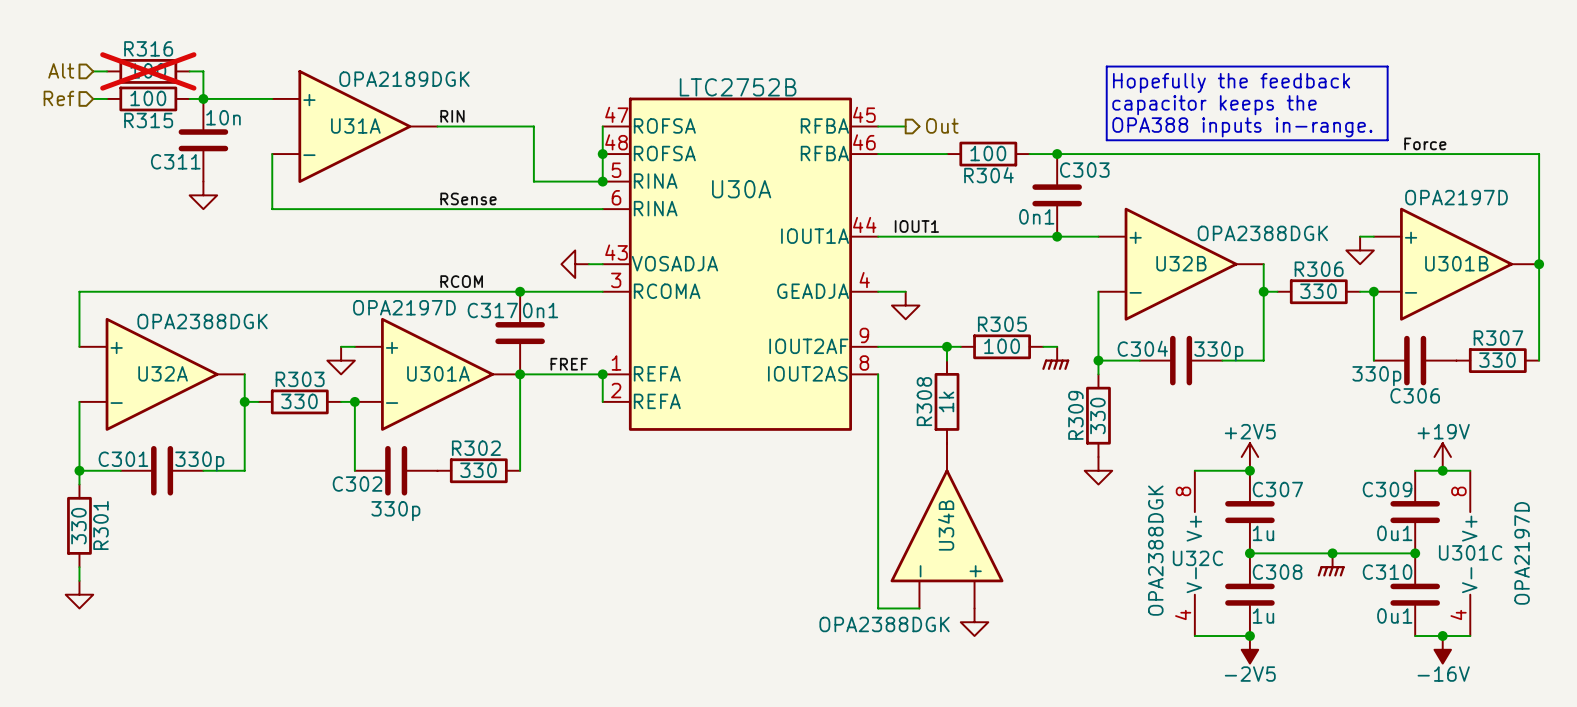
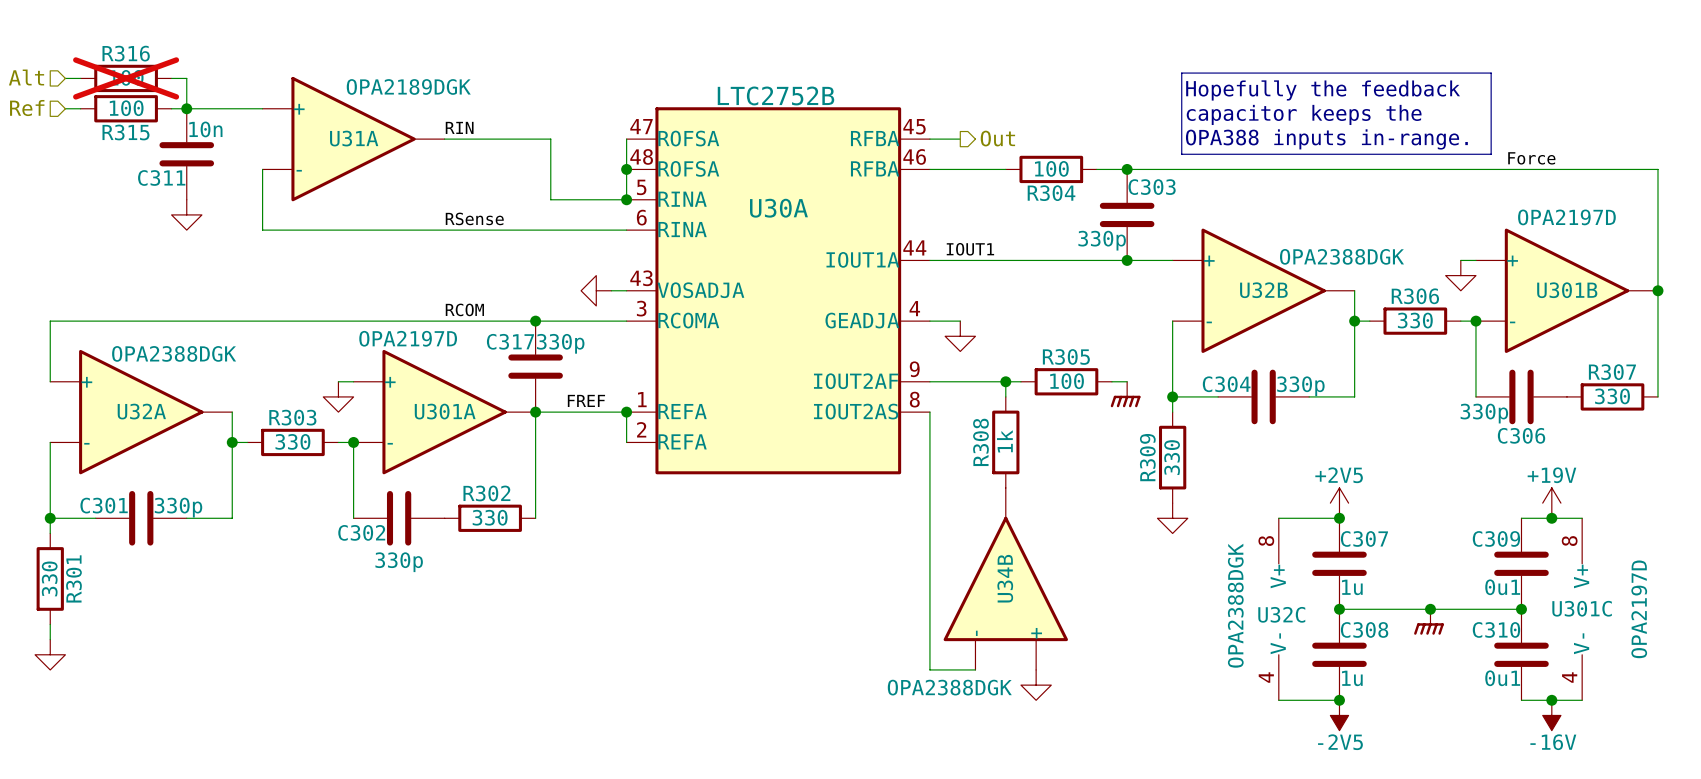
C303 value: 0n1 (1036, 216) -> 330p (1102, 240)
C317 value: 0n1 (540, 310) -> 330p (560, 343)

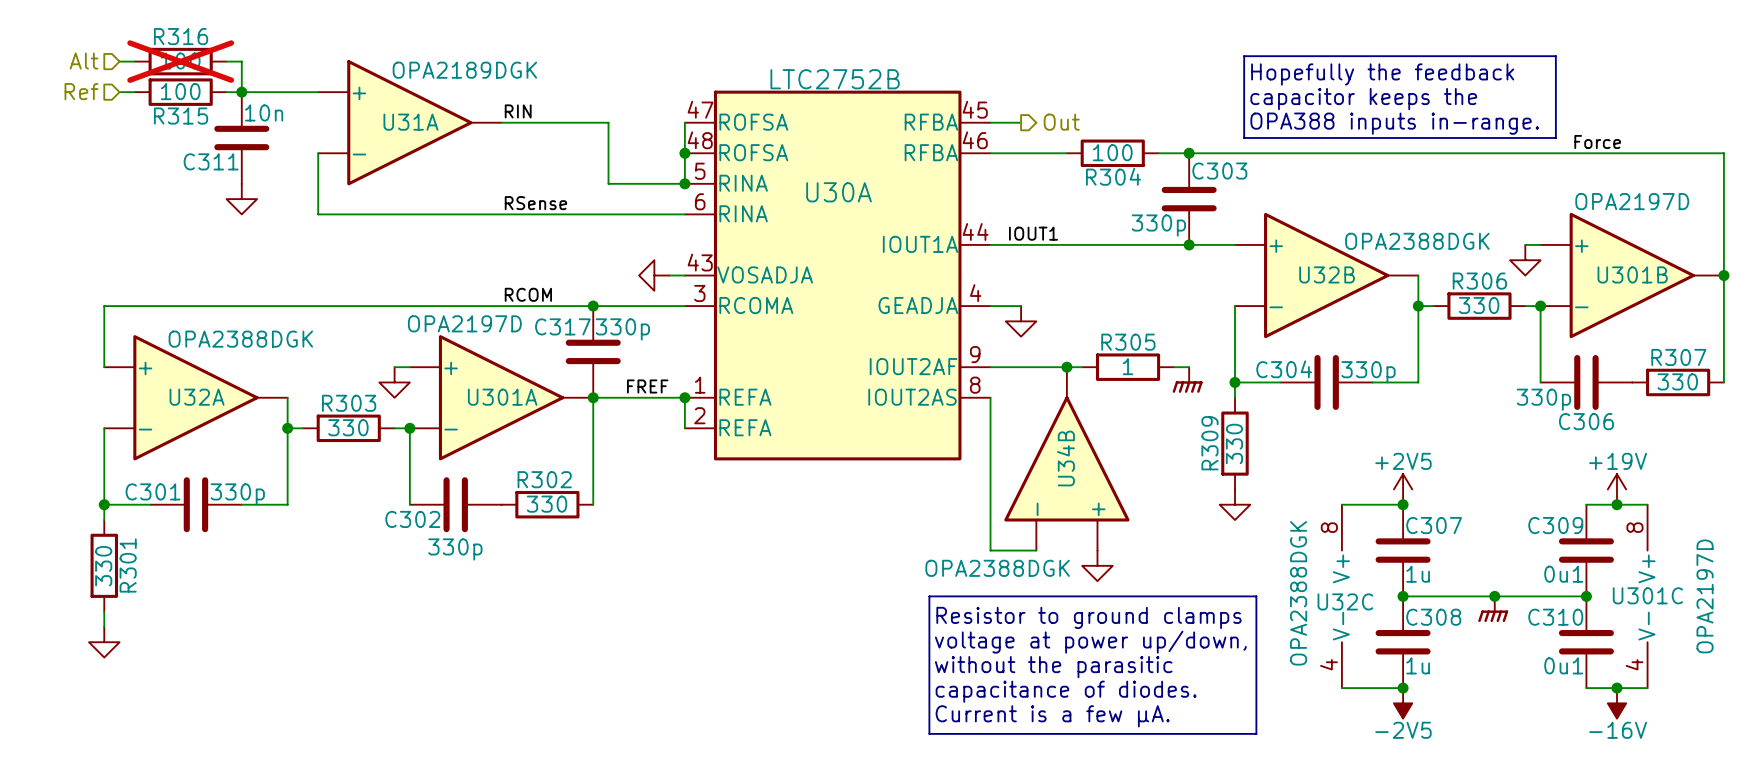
R305 value: 100 (1067, 381) -> 1 (1128, 366)
R308: 1k (1005, 442) -> none
wire: (929, 563) (929, 669) (975, 669) -> (990, 550) (1036, 550)
U34B position: (1005, 578) -> (1066, 458)
line: none -> (929, 596) (1256, 596) (1256, 733) (929, 733) (929, 596)
text: none -> Resistor to ground clamps (1089, 617)
text: none -> voltage at power up/down, (1090, 642)
text: none -> without the parasitic (1053, 667)
power symbol position: (1036, 685) -> (1097, 565)
text: none -> capacitance of diodes. (1066, 691)
text: none -> Current is a few µA. (1052, 716)

